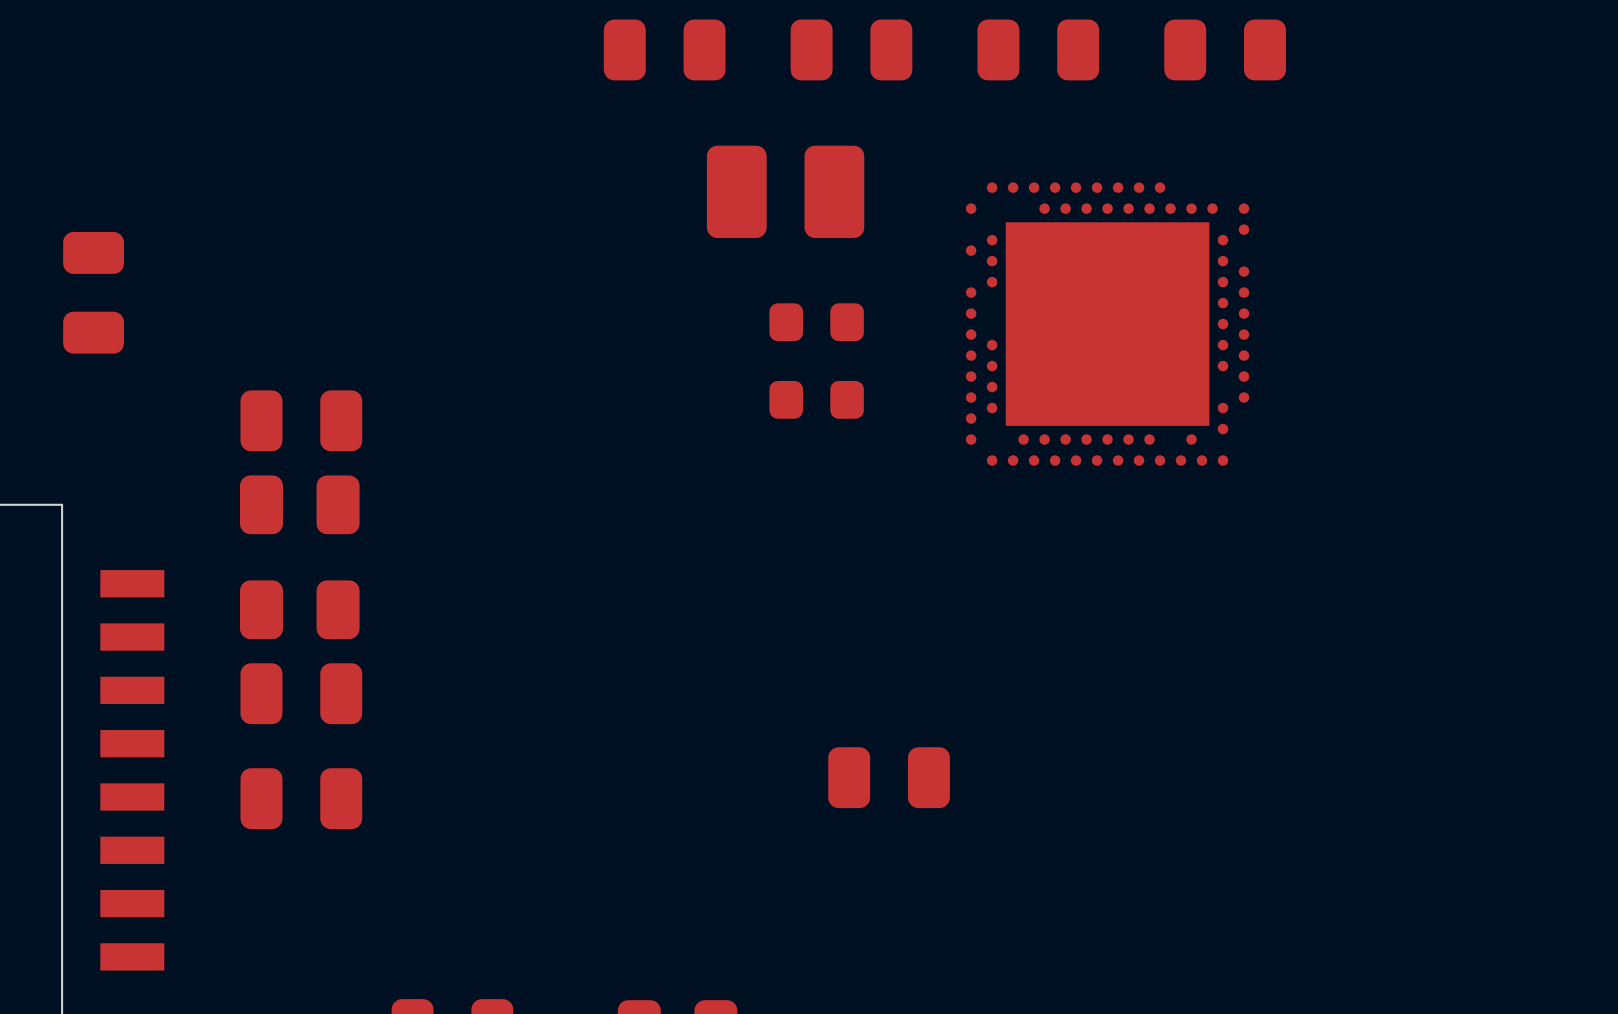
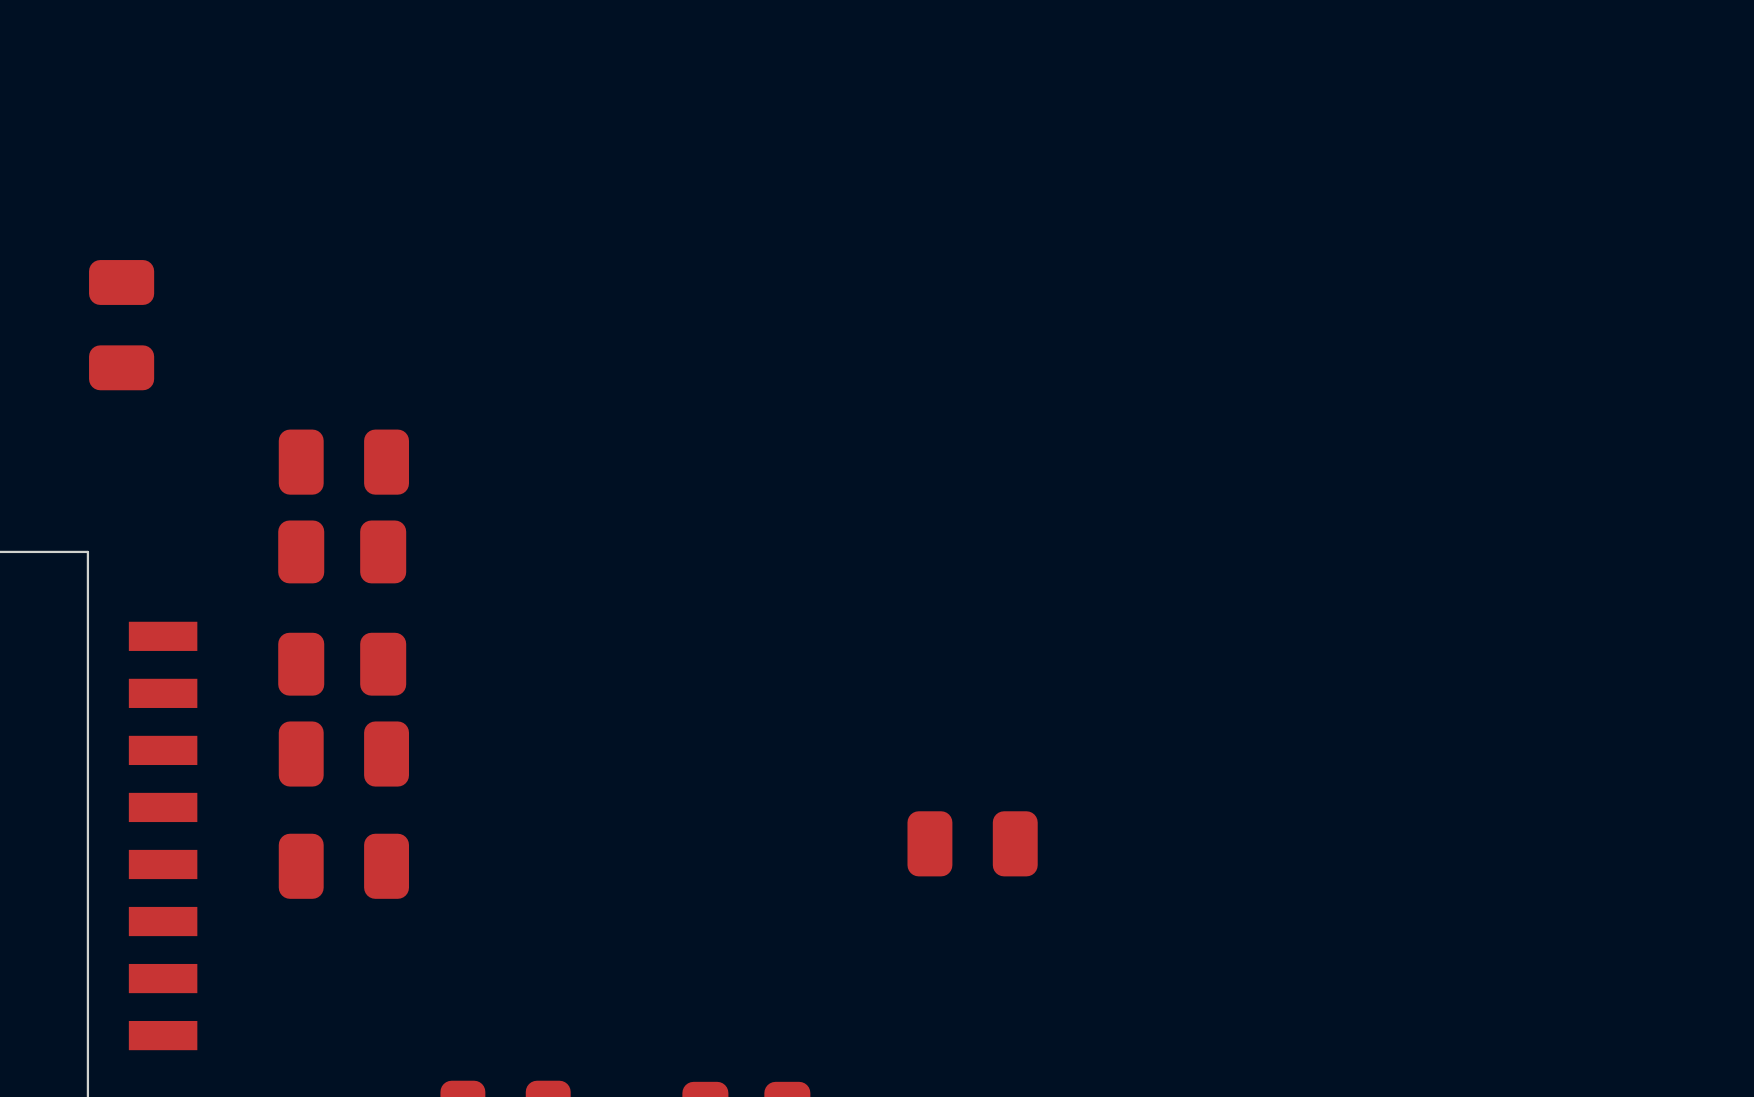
part: (664, 49) -> none
part: (851, 49) -> none
part: (1038, 49) -> none
part: (1225, 49) -> none
part: (785, 191) -> none
part: (1107, 324) -> none
part: (816, 361) -> none

